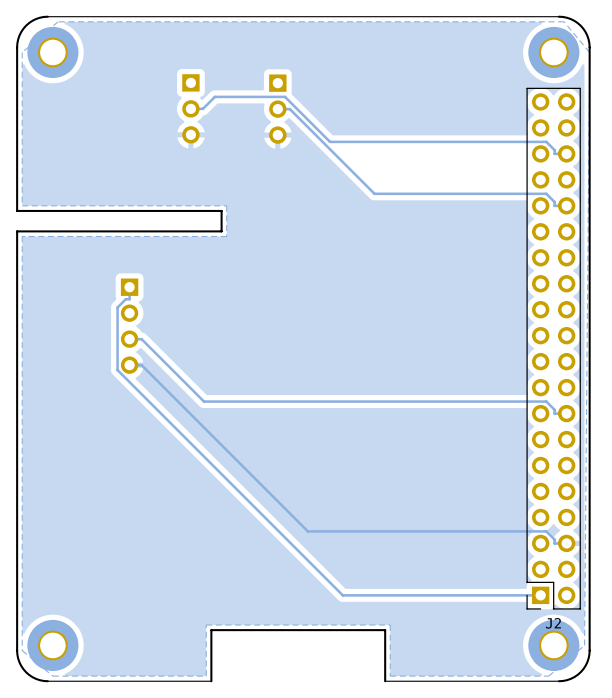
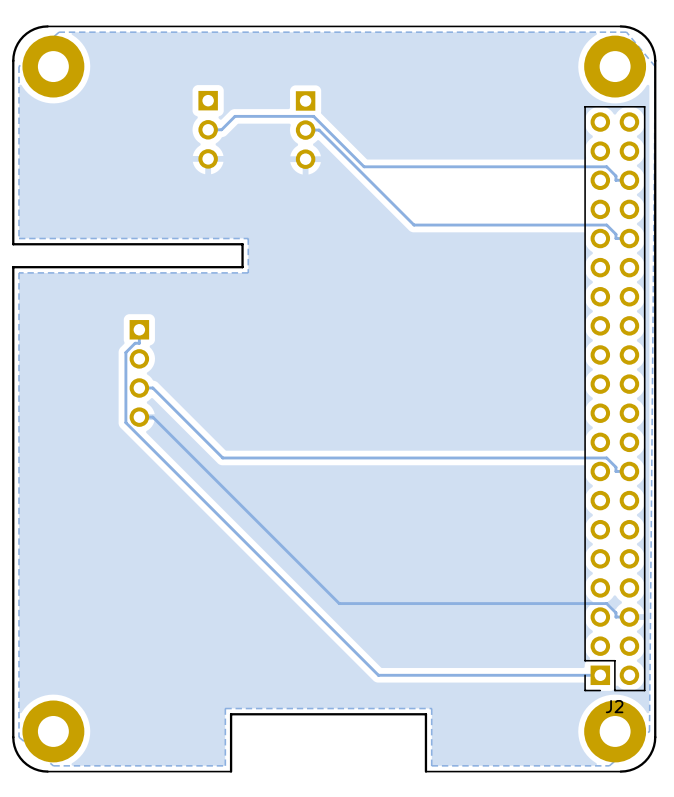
part footprint: [27, 26, 79, 79] -> [22, 35, 85, 98]
part footprint: [528, 26, 580, 79] -> [584, 35, 647, 98]
part footprint: [27, 619, 79, 672] -> [22, 700, 85, 763]
part footprint: [528, 619, 580, 672] -> [584, 700, 647, 763]

